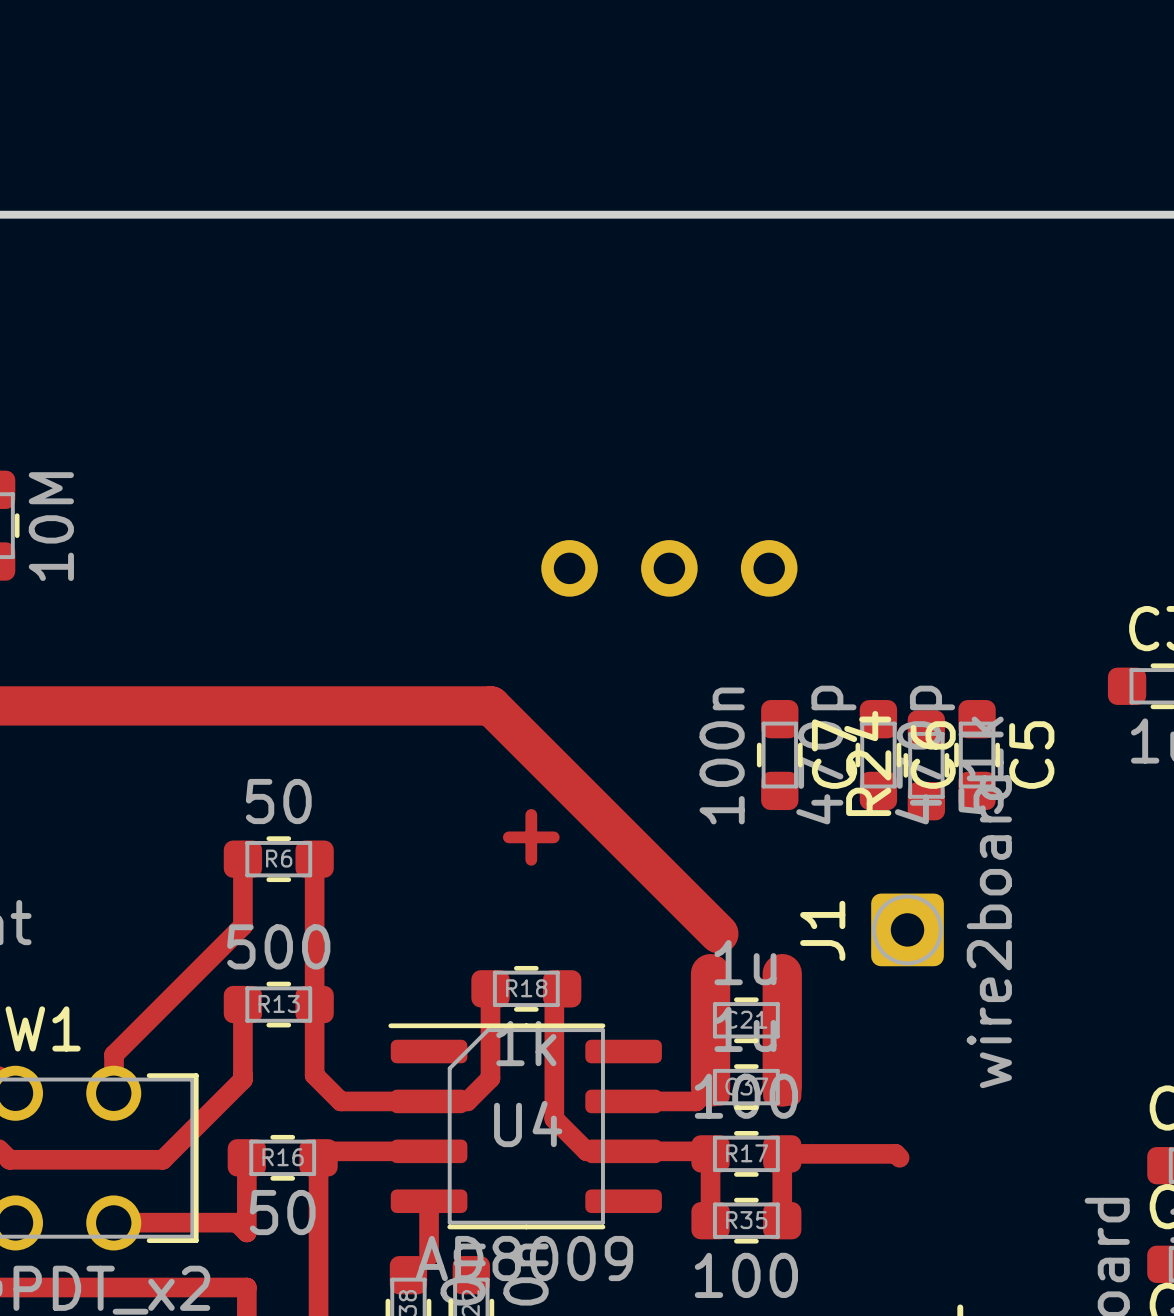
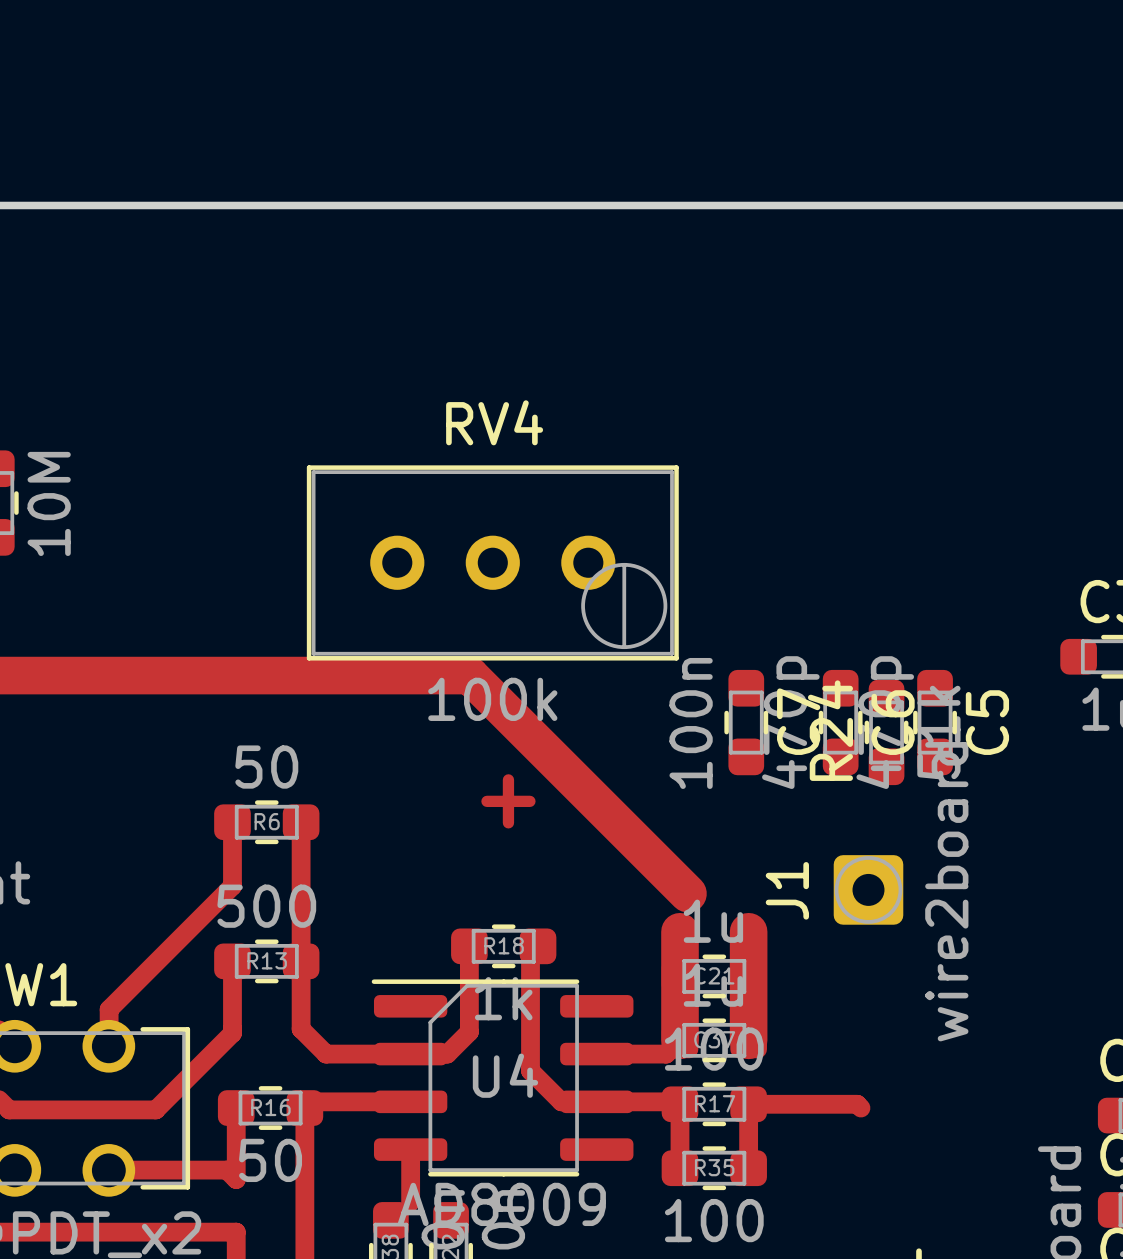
RV4 side: bottom (669, 568) -> top (492, 562)

